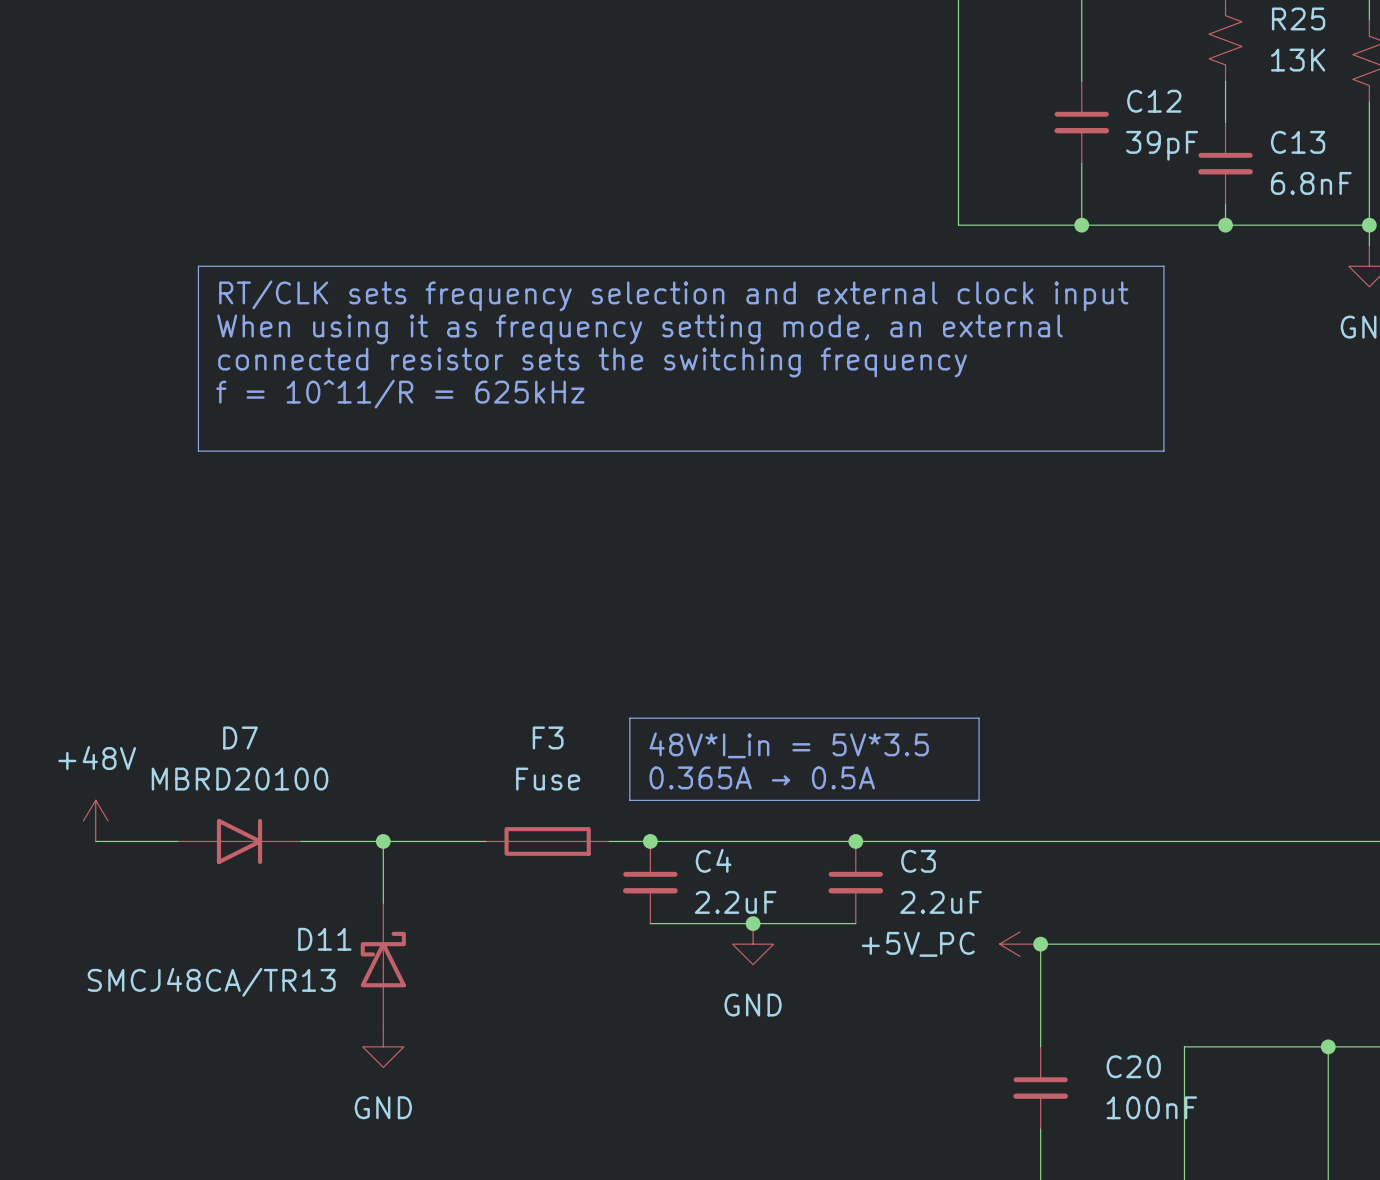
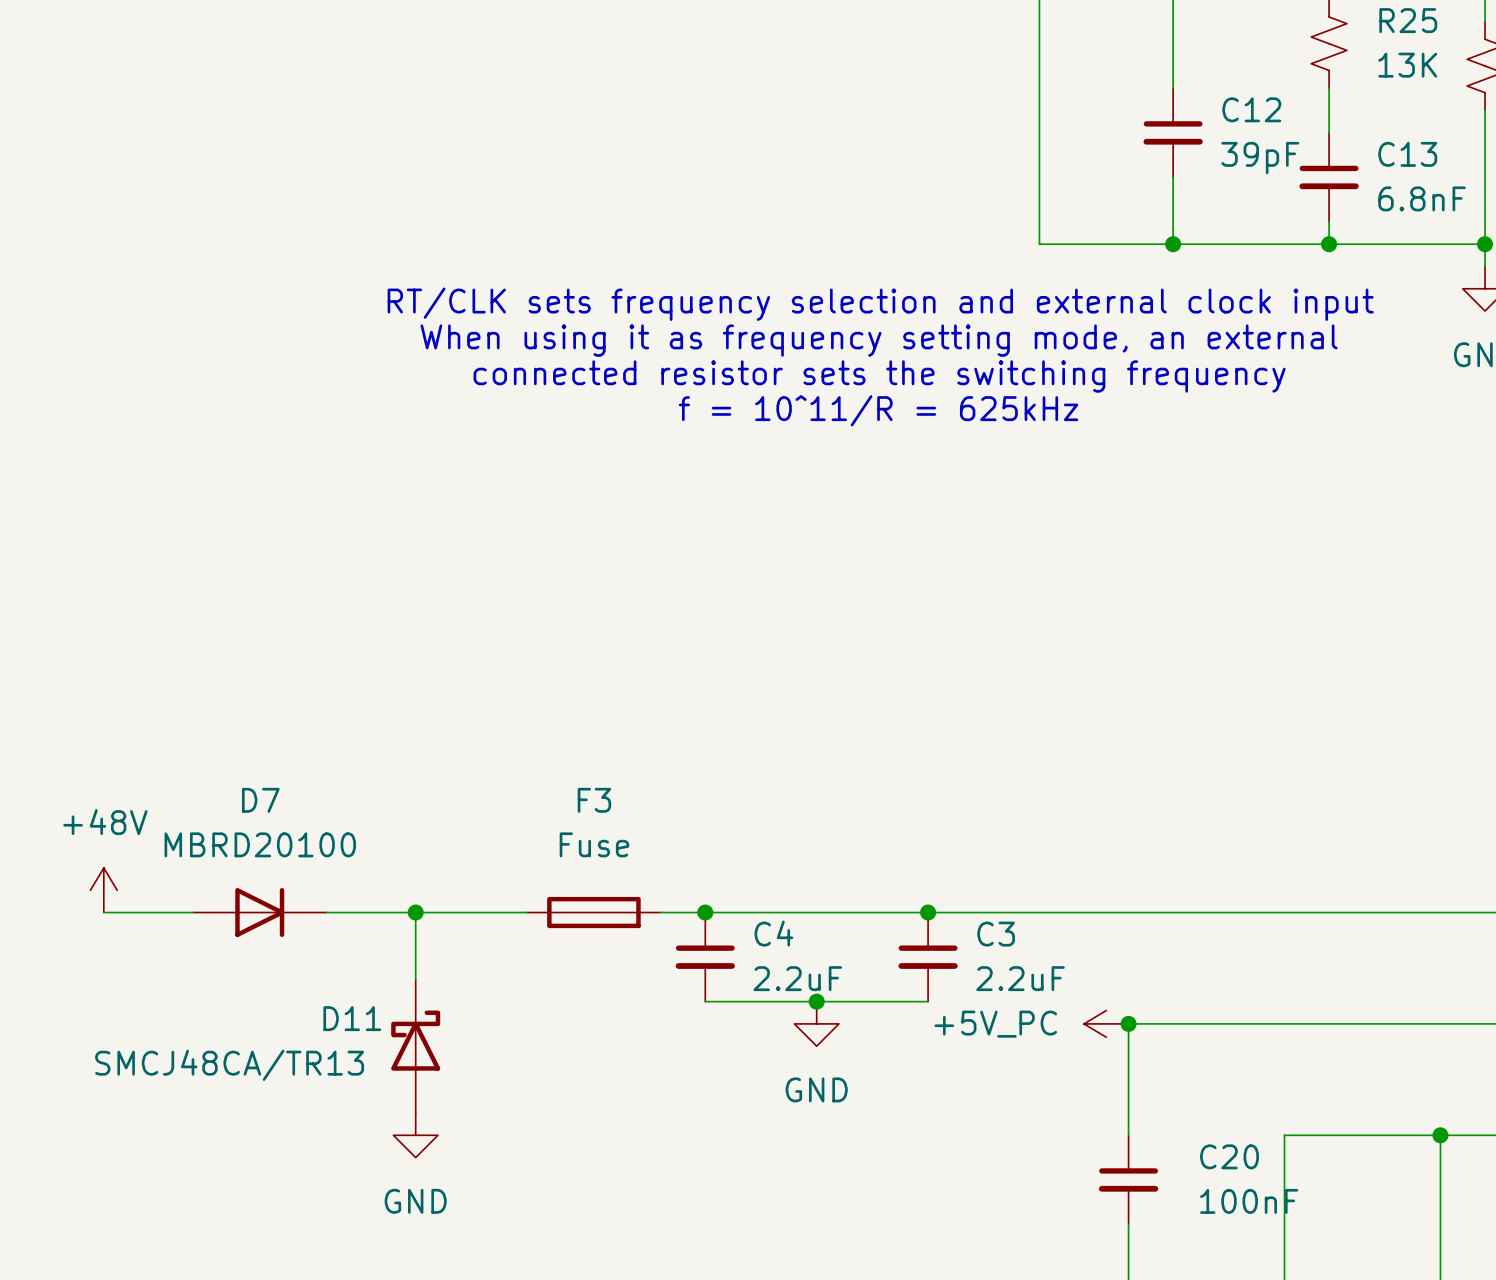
line: (198, 266) (1163, 266) (1163, 451) (198, 451) (198, 266) -> none
text: none -> RT/CLK sets frequency selection and external clock input (880, 304)
text: RT/CLK sets frequency selection and external clock input (673, 295) -> none
text: none -> When using it as frequency setting mode, an external (879, 340)
text: When using it as frequency setting mode, an external (640, 329) -> none
text: none -> connected resistor sets the switching frequency (879, 376)
text: connected resistor sets the switching frequency (592, 362) -> none
text: none -> f = 10^11/R = 625kHz (878, 410)
text: f = 10^11/R = 625kHz (400, 394) -> none
line: (629, 718) (979, 718) (979, 800) (629, 800) (629, 718) -> none
text: 48V*I_in = 5V*3.5 (789, 745) -> none
text: 0.365A → 0.5A (762, 777) -> none

